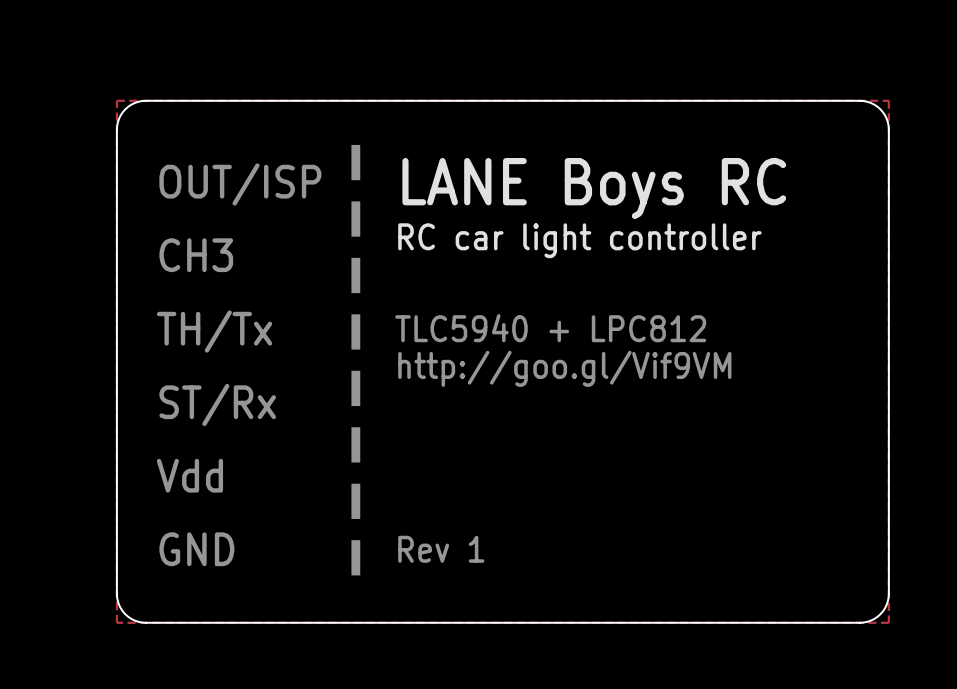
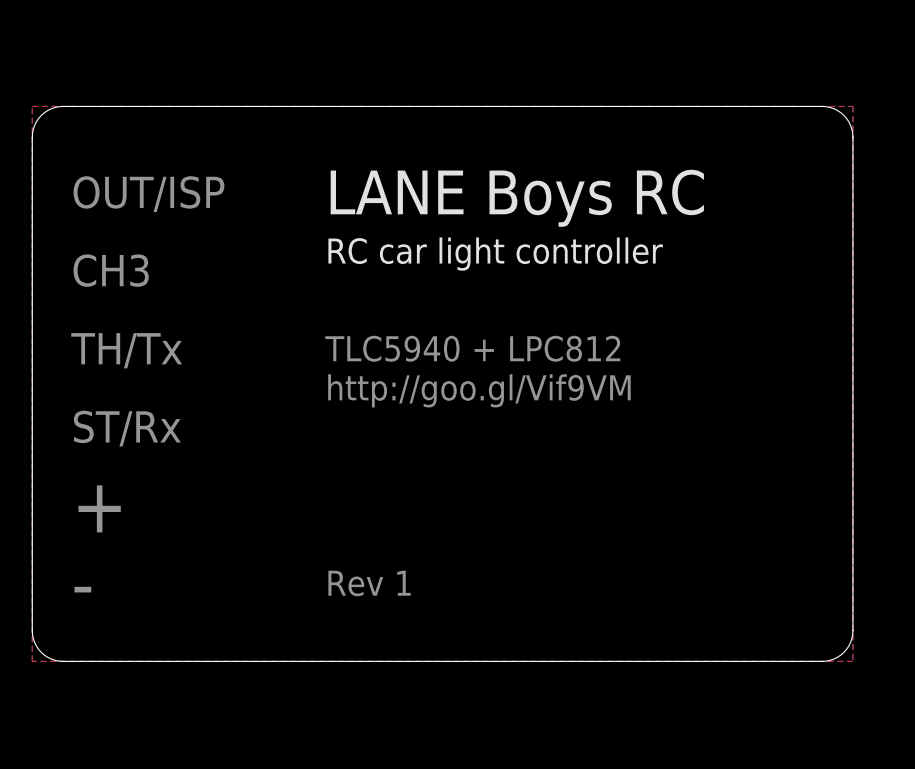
line: (355, 144) (355, 586) -> none
text: Vdd (189, 475) -> + (99, 508)
text: GND (196, 549) -> - (82, 589)

